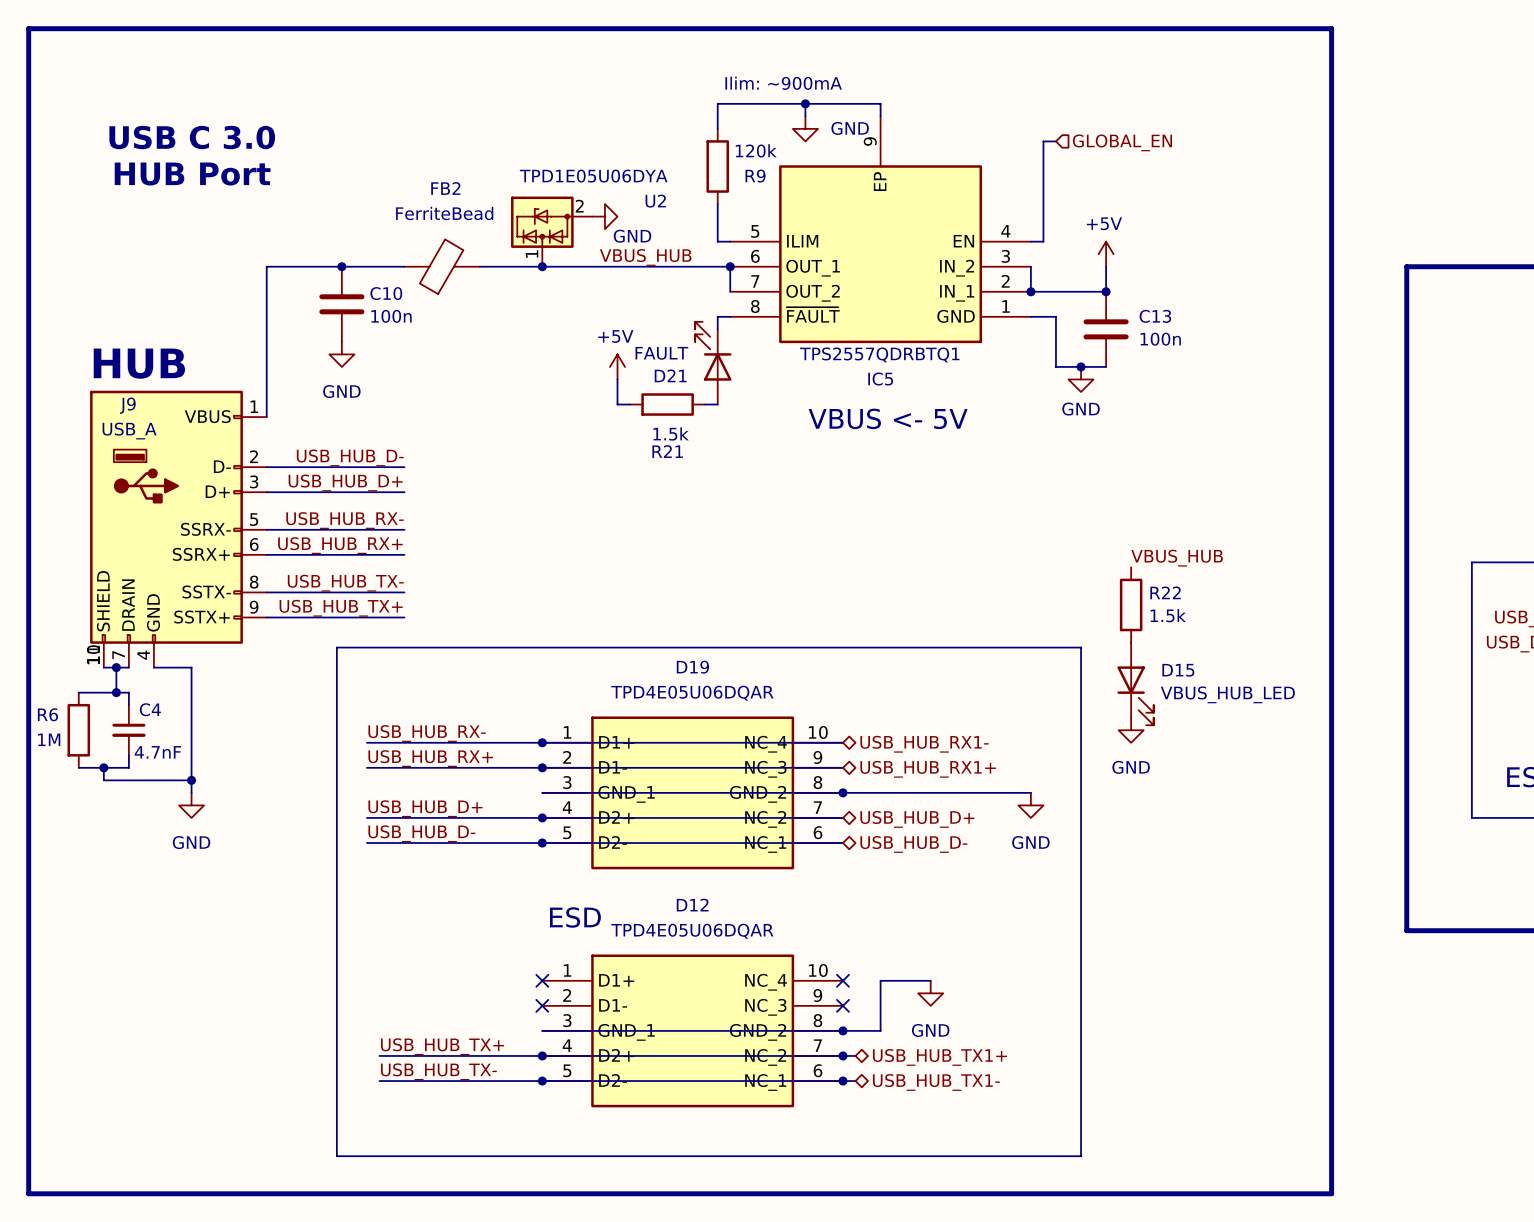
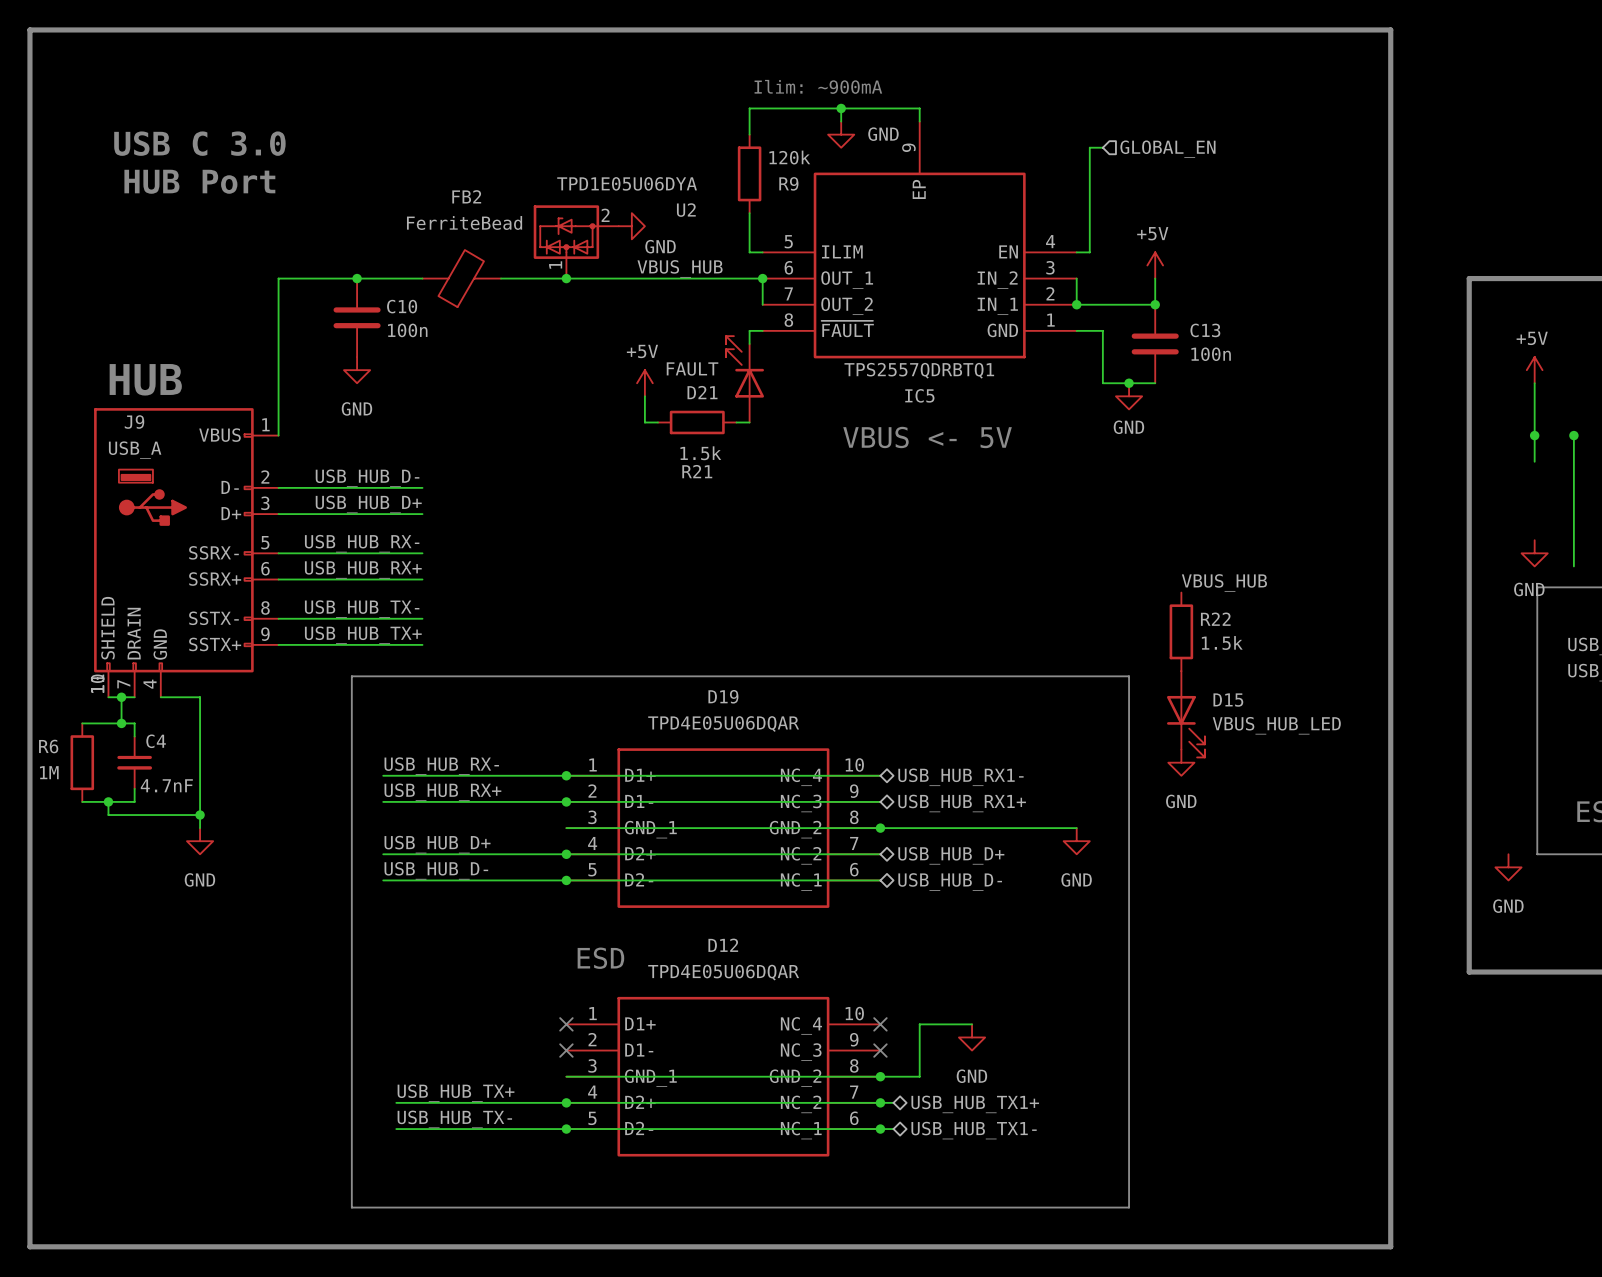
power symbol: none -> +5V (1534, 370)
wire: none -> (1534, 383) (1534, 461)
junction: none -> (1534, 435)
wire: none -> (1573, 435) (1573, 566)
junction: none -> (1573, 435)
power symbol: none -> GND (1534, 553)
power symbol: none -> GND (1508, 867)

